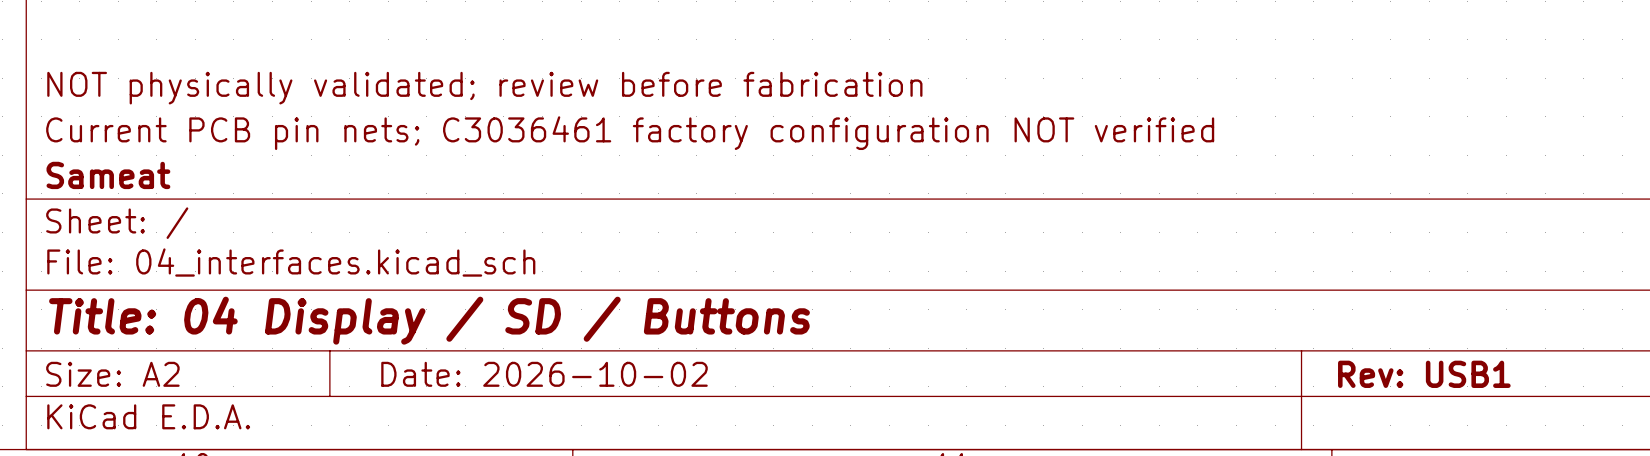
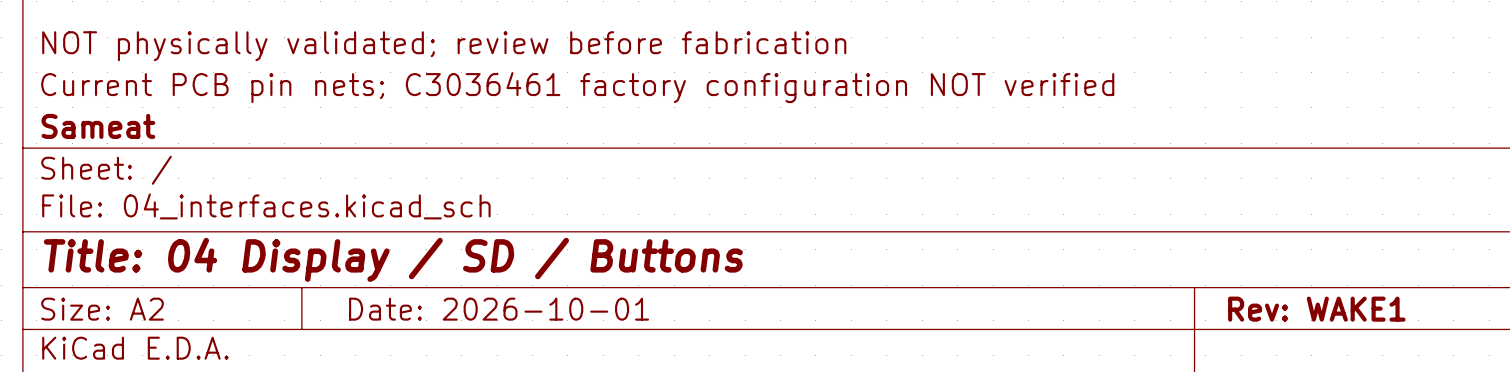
title block: Date: 2026-10-02 (544, 374) -> Date: 2026-10-01 (499, 309)
title block: Rev: USB1 (1424, 374) -> Rev: WAKE1 (1316, 309)

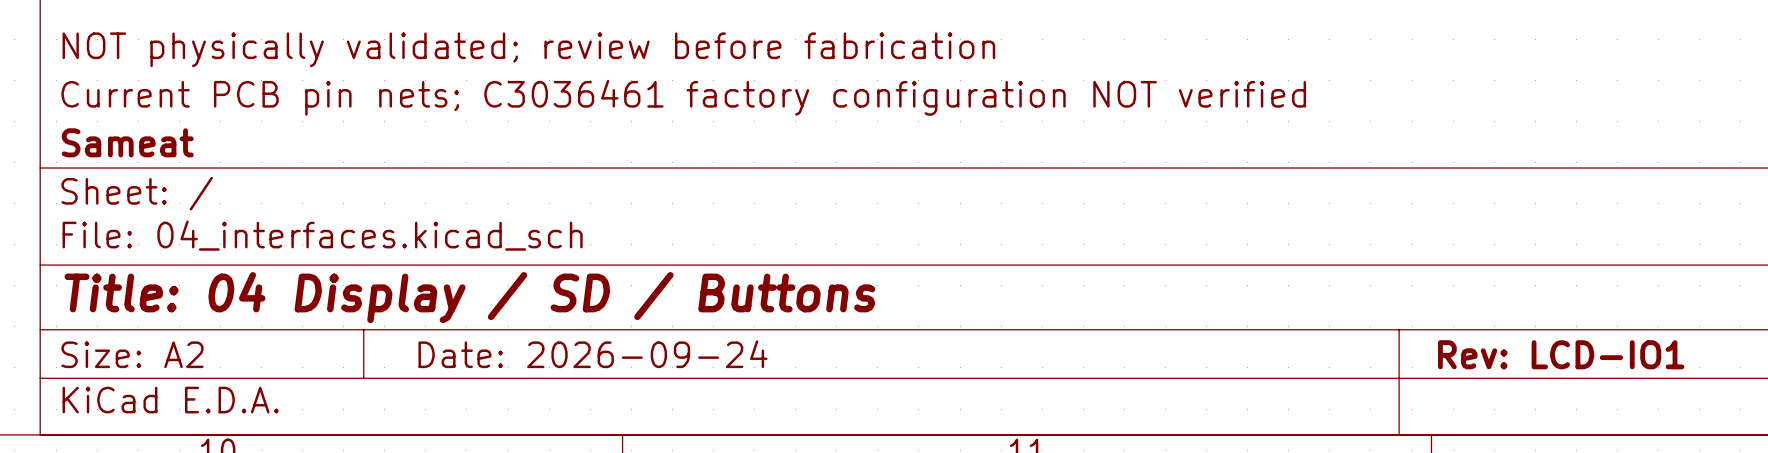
title block: Date: 2026-10-01 (499, 309) -> Date: 2026-09-24 (593, 354)
title block: Rev: WAKE1 (1316, 309) -> Rev: LCD-IO1 (1561, 354)

